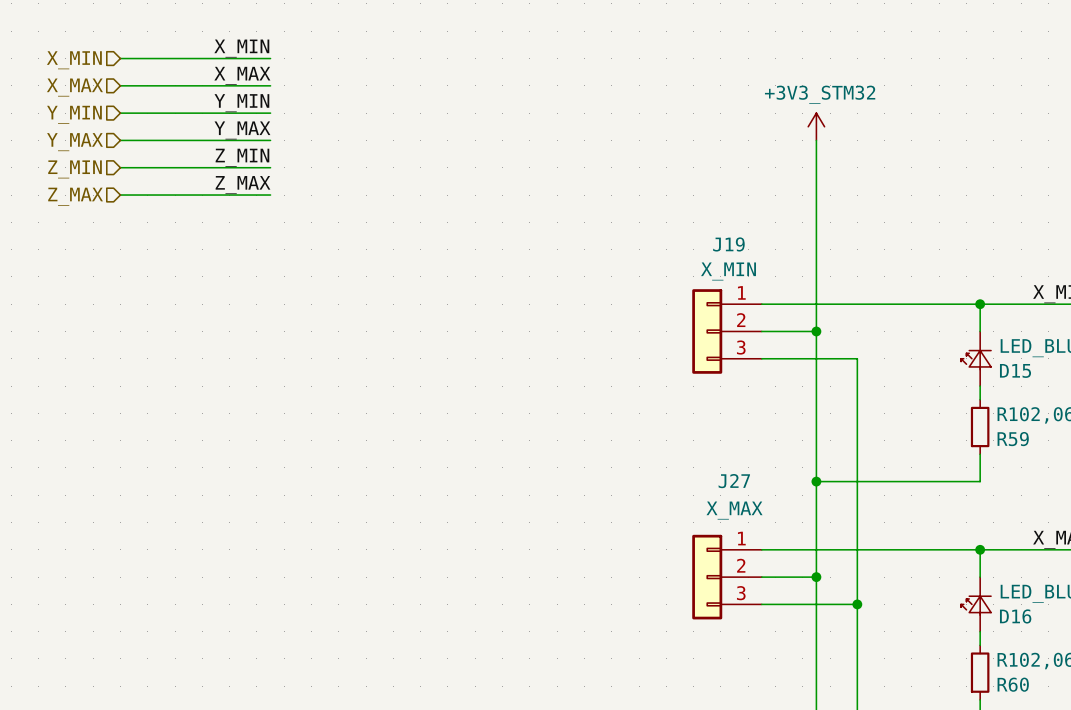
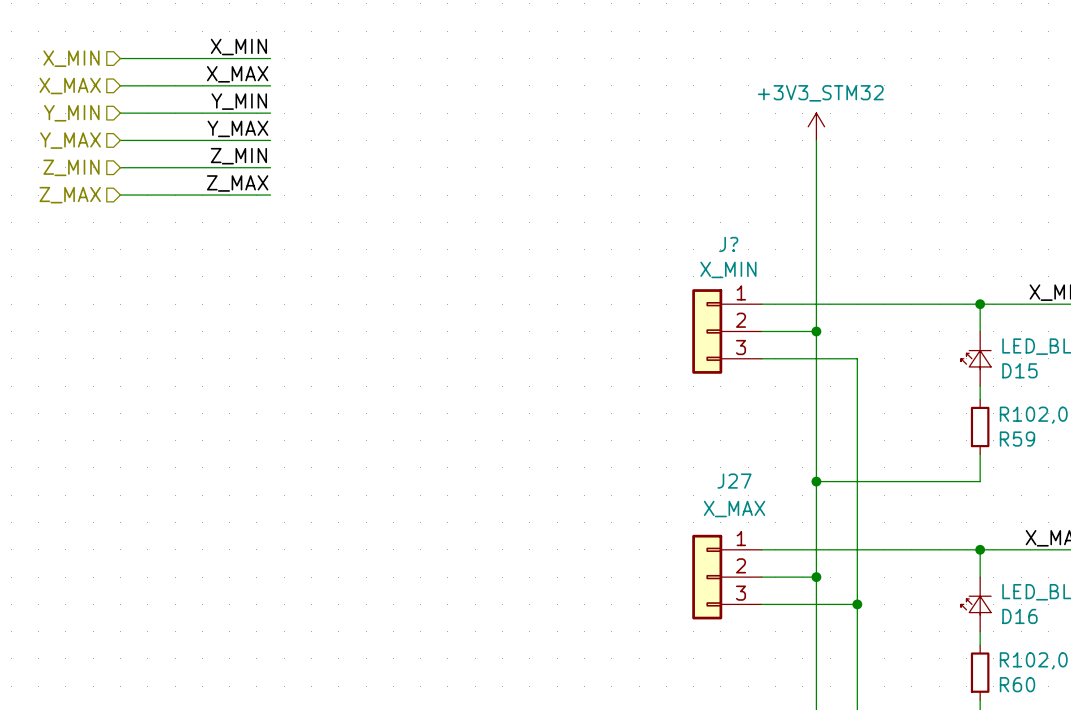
J19 name: J19 (728, 244) -> J? (728, 244)

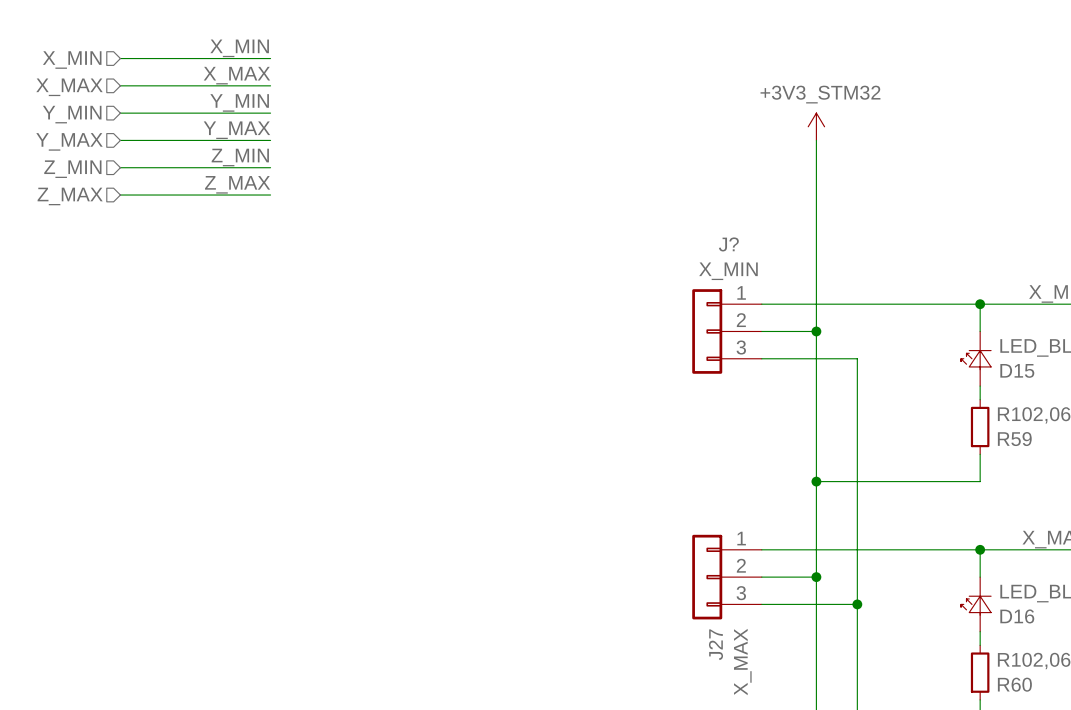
J27 name rotation: 0° (734, 481) -> 90° counterclockwise (715, 644)
J27 name position: J27 (734, 481) -> J27 (715, 644)
J27 value rotation: 0° (734, 509) -> 90° counterclockwise (742, 662)
J27 value position: X_MAX (734, 509) -> X_MAX (742, 662)

